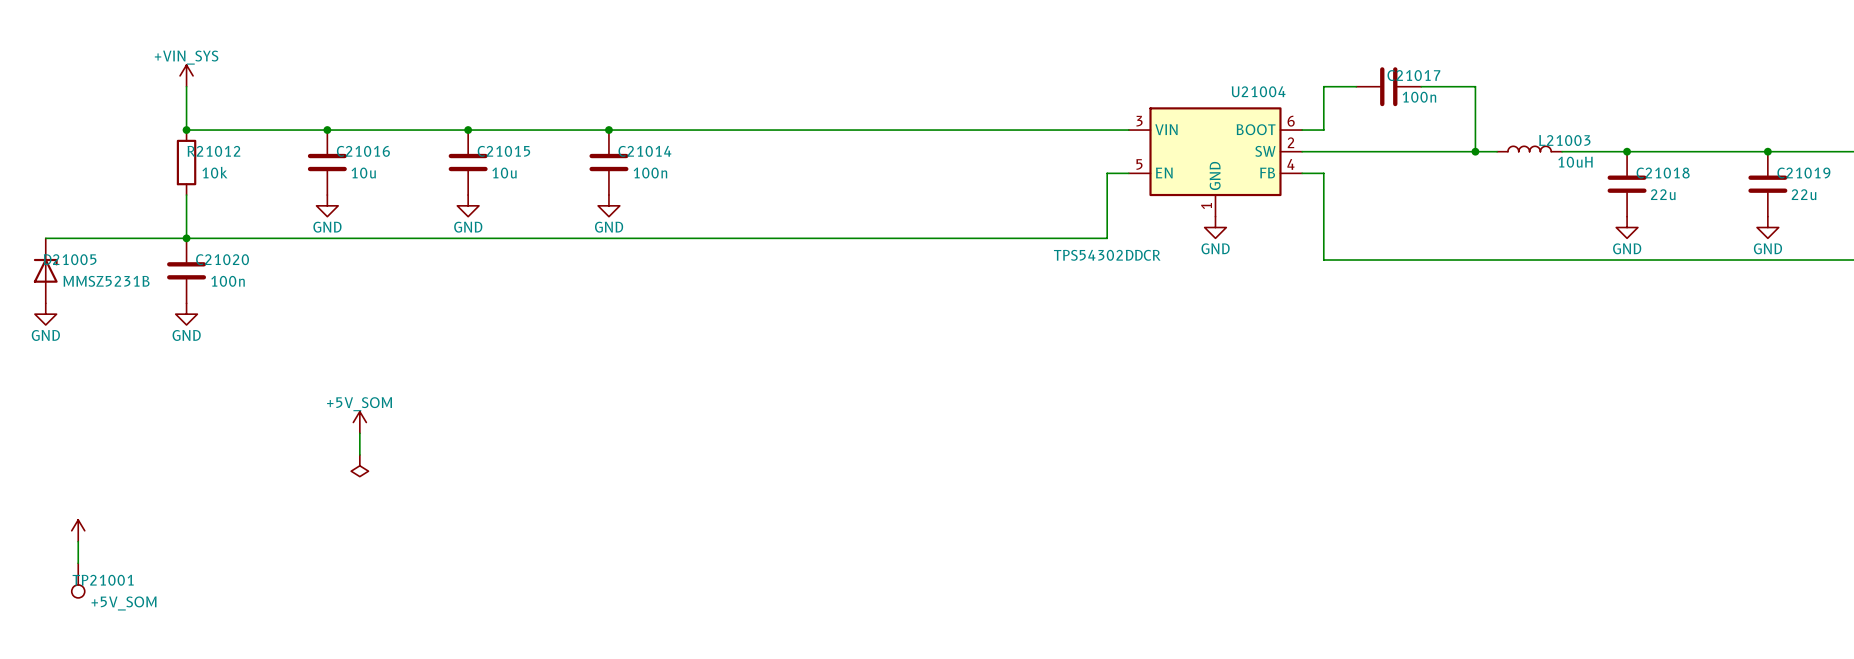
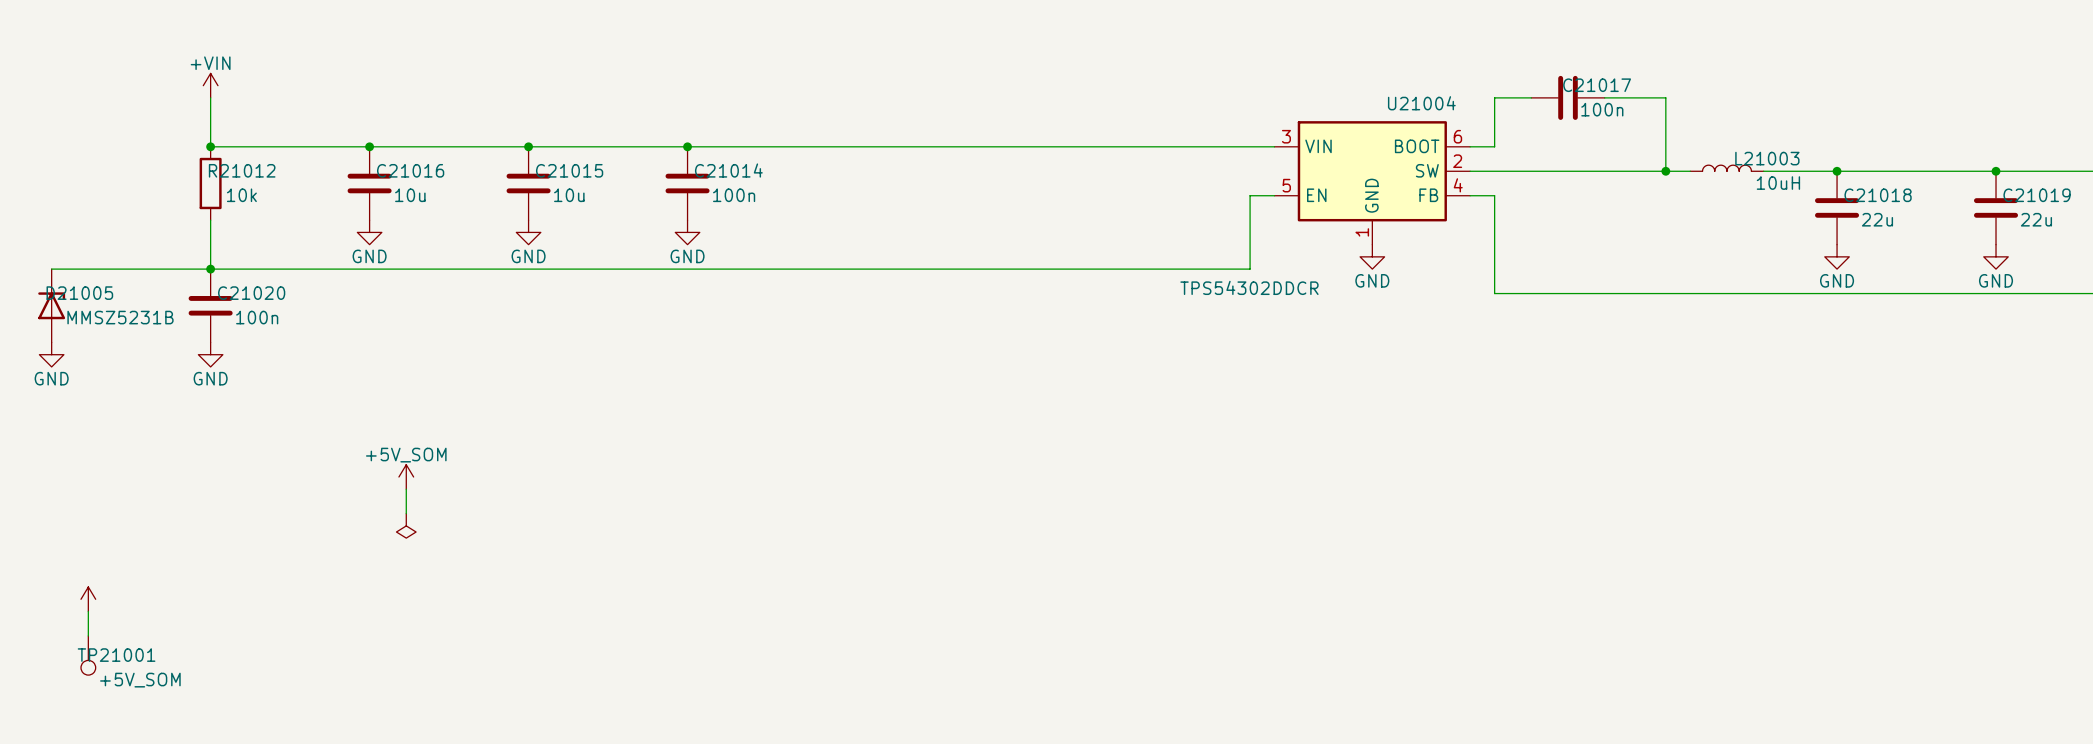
power symbol: +VIN_SYS (186, 75) -> +VIN (210, 85)

